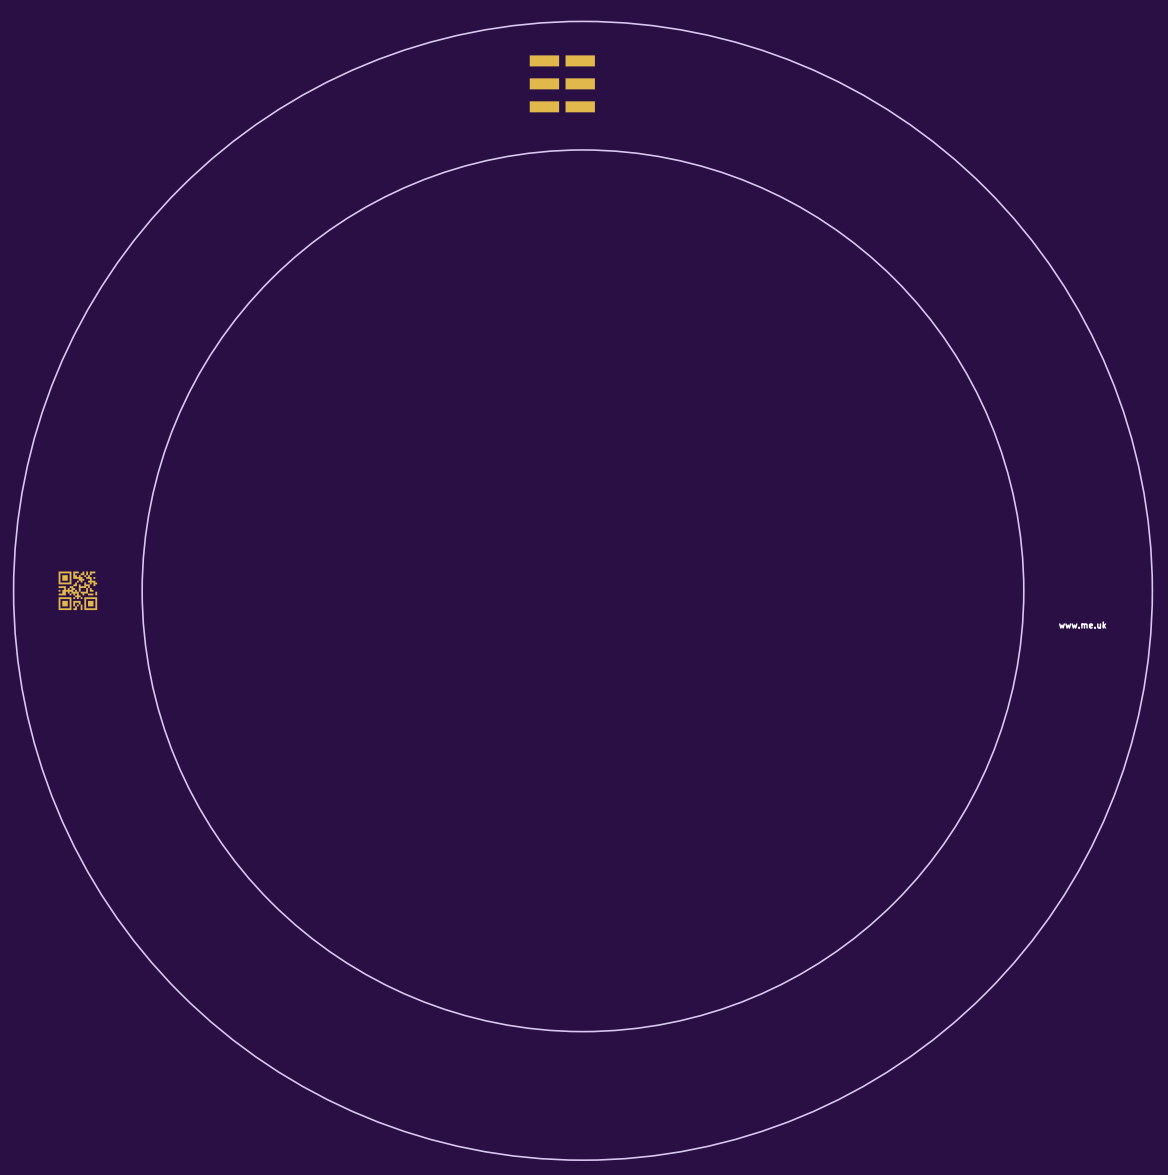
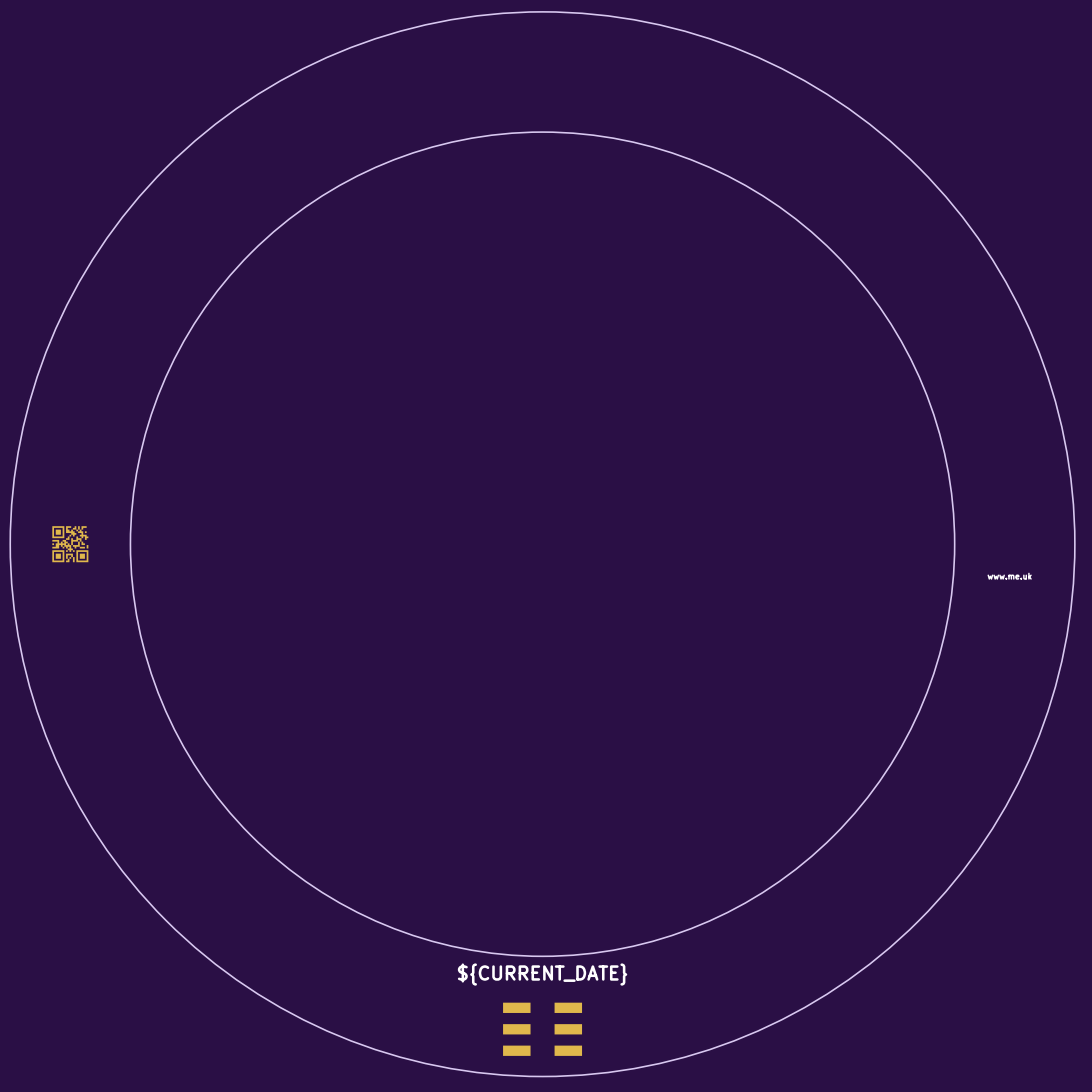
part: (544, 83) -> none
part: (580, 83) -> none
text: none -> ${CURRENT_DATE} (542, 974)
part: none -> (516, 1029)
part: none -> (568, 1029)

